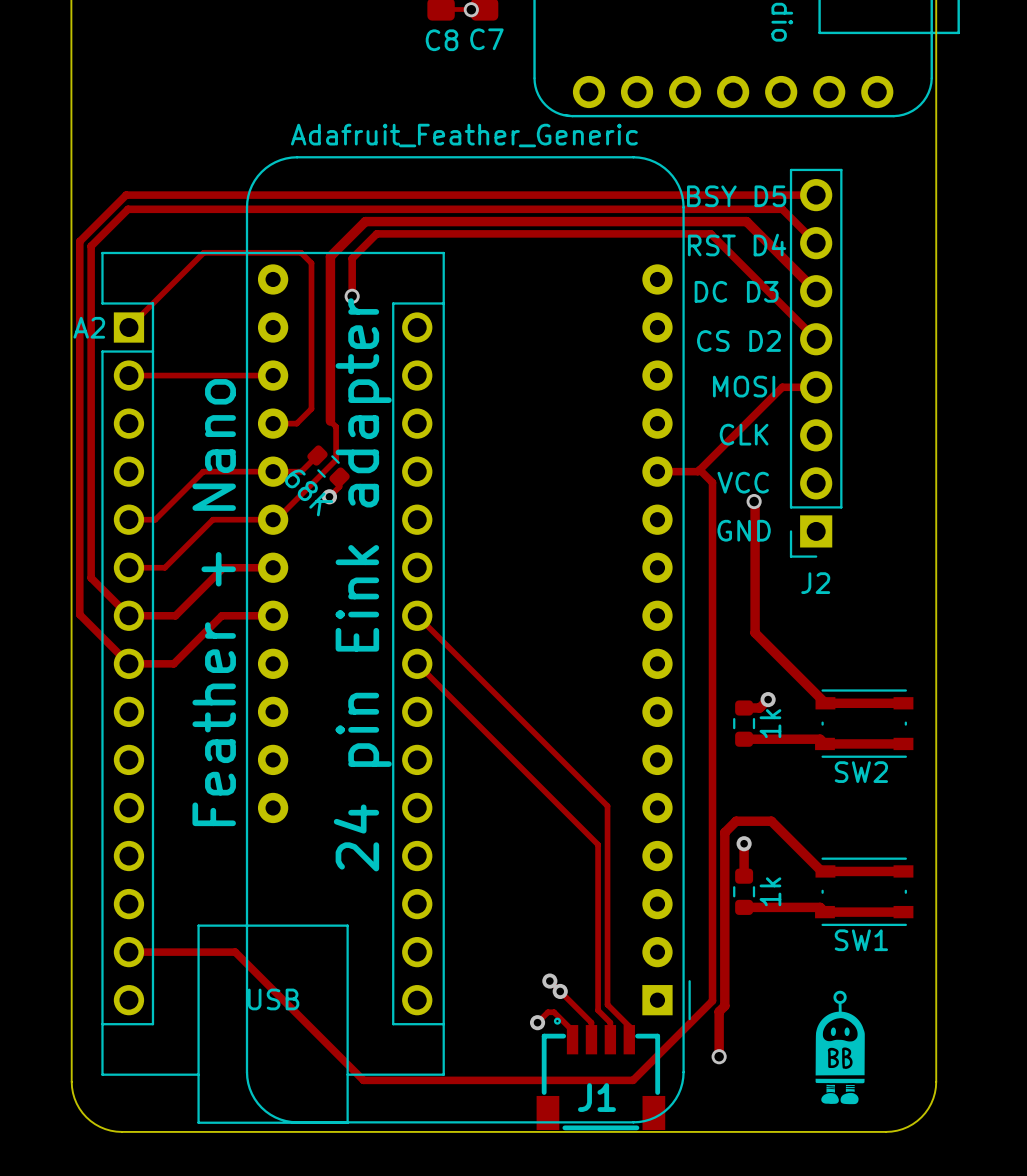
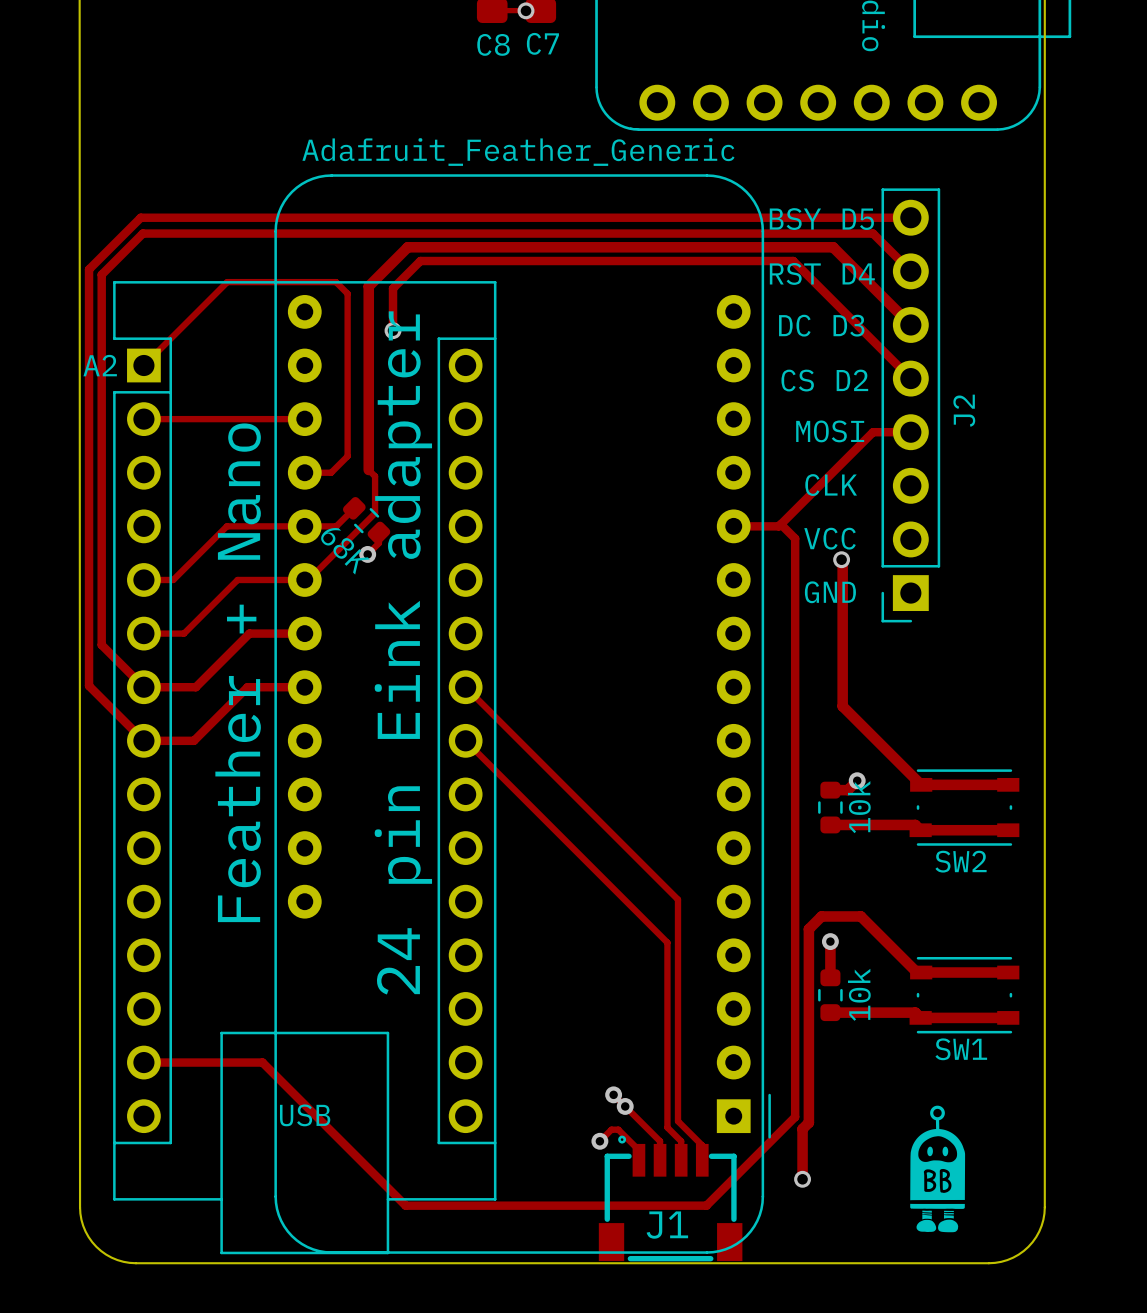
J2 name rotation: 0° (815, 583) -> 90° counterclockwise (964, 410)
J2 name position: J2 (815, 583) -> J2 (964, 410)
part value: 1k (770, 723) -> 10k (859, 807)
part value: 1k (770, 891) -> 10k (859, 994)

